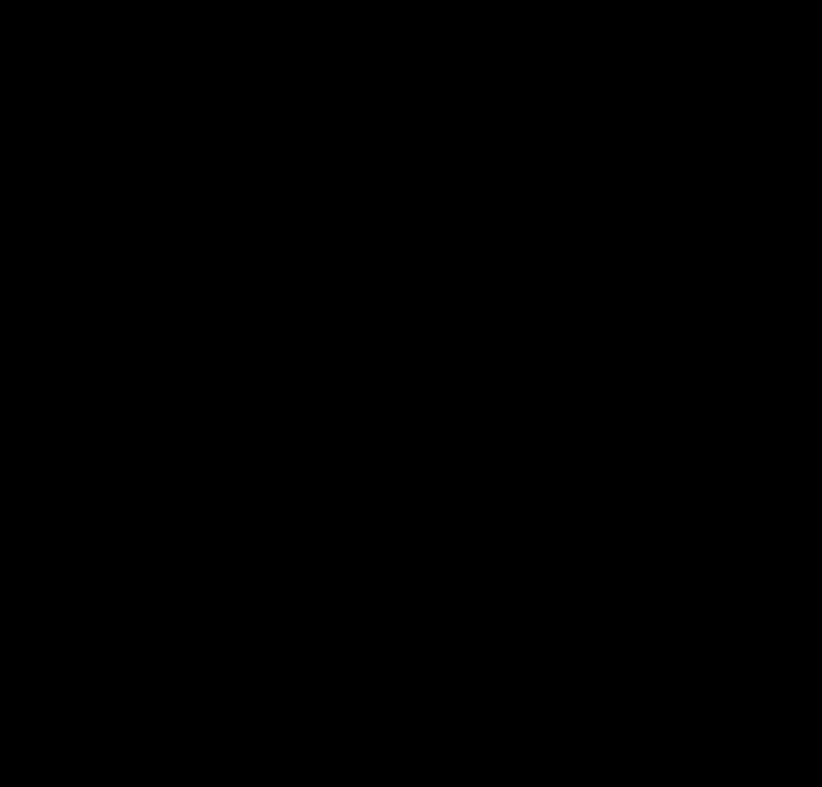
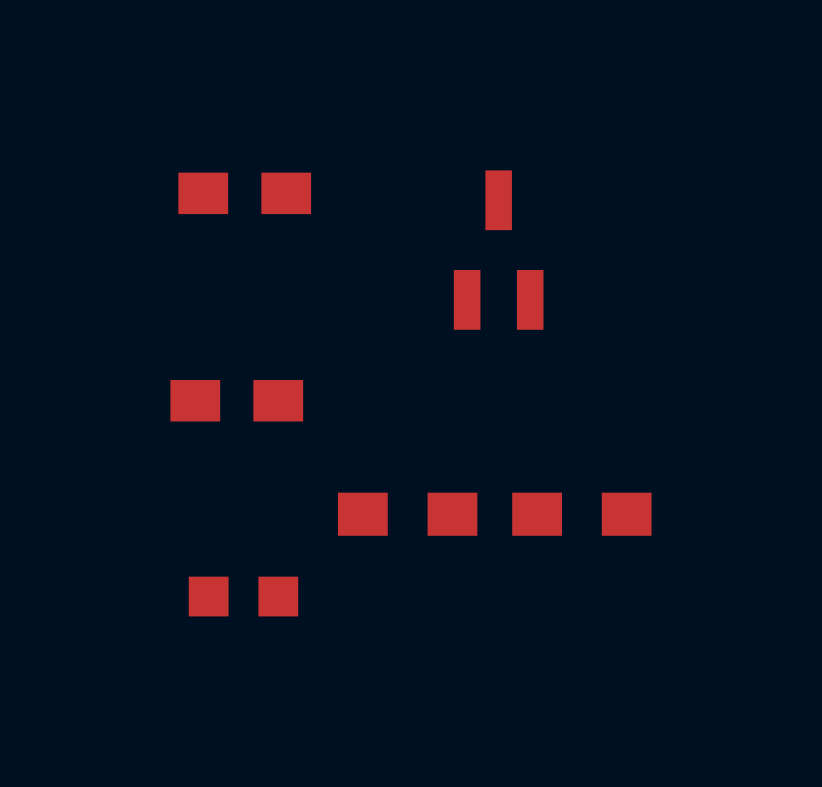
part: none -> (244, 193)
part: none -> (498, 250)
part: none -> (236, 400)
part: none -> (407, 514)
part: none -> (581, 514)
part: none -> (243, 596)

